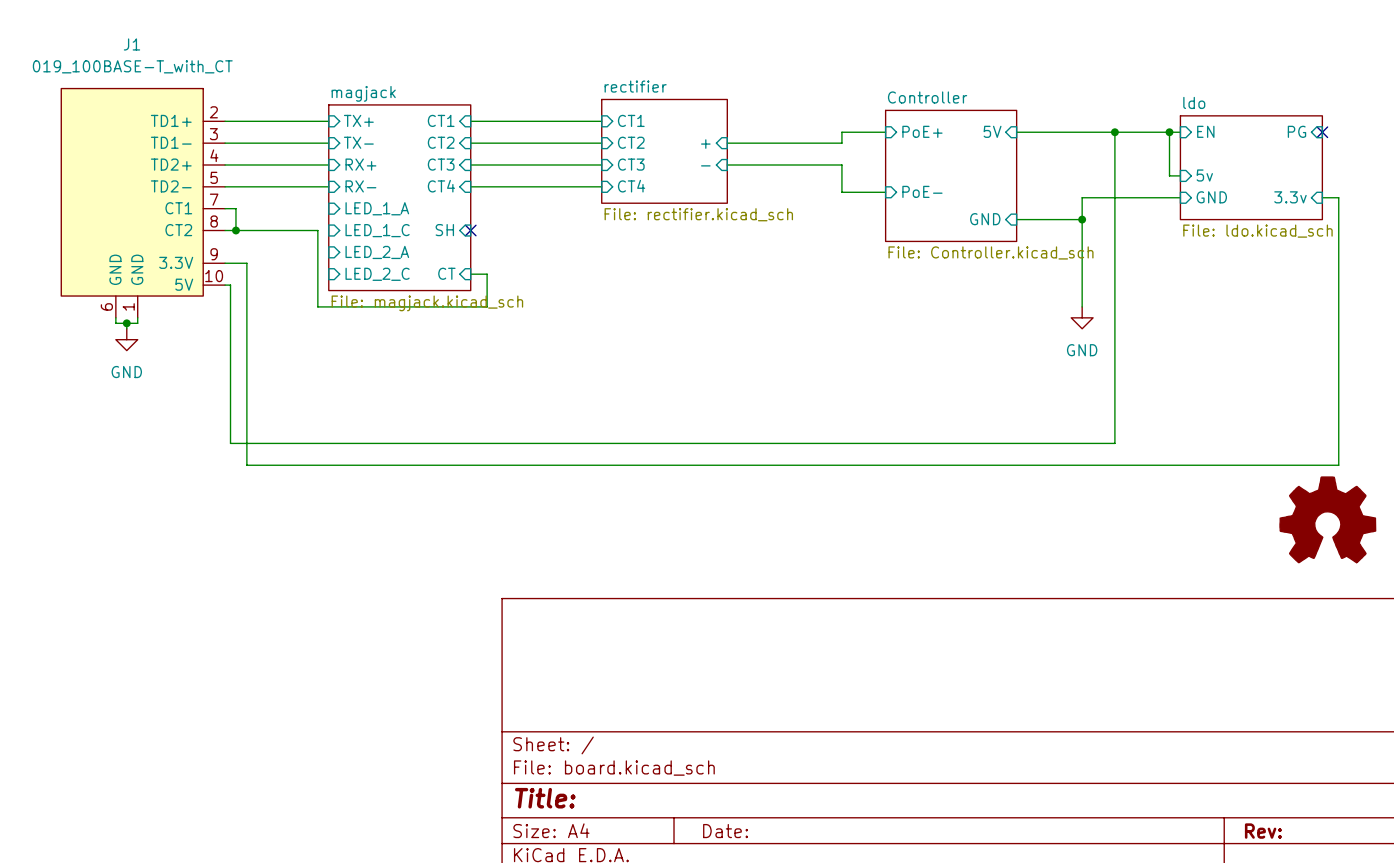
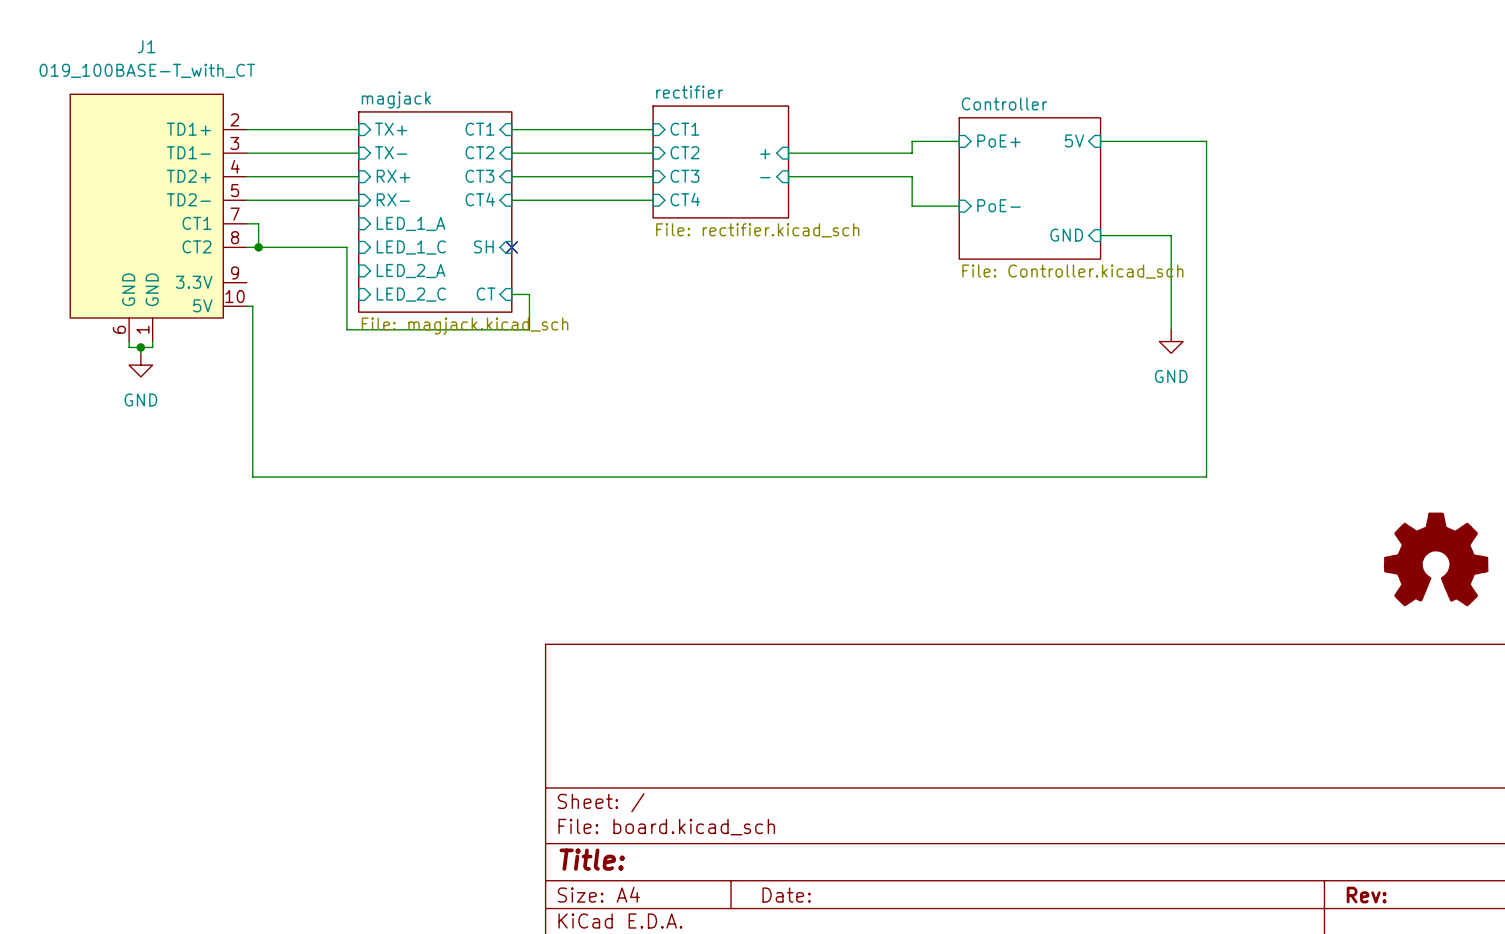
sheet pin: EN (1205, 131) -> none
sheet pin: PG (1296, 131) -> none
wire: (1114, 132) (1180, 132) -> none
junction: (1114, 132) -> none
wire: (1169, 132) (1169, 175) (1180, 175) -> none
junction: (1169, 132) -> none
no-connect mark: (1322, 132) -> none
sheet ldo: File: ldo.kicad_sch (1251, 167) -> none
sheet pin: 5v (1204, 175) -> none
wire: (1180, 197) (1082, 197) (1082, 219) -> none
sheet pin: GND (1211, 197) -> none
sheet pin: 3.3v (1290, 197) -> none
wire: (1322, 197) (1338, 197) (1338, 465) (246, 465) (246, 263) (225, 263) -> none
junction: (1082, 219) -> none

